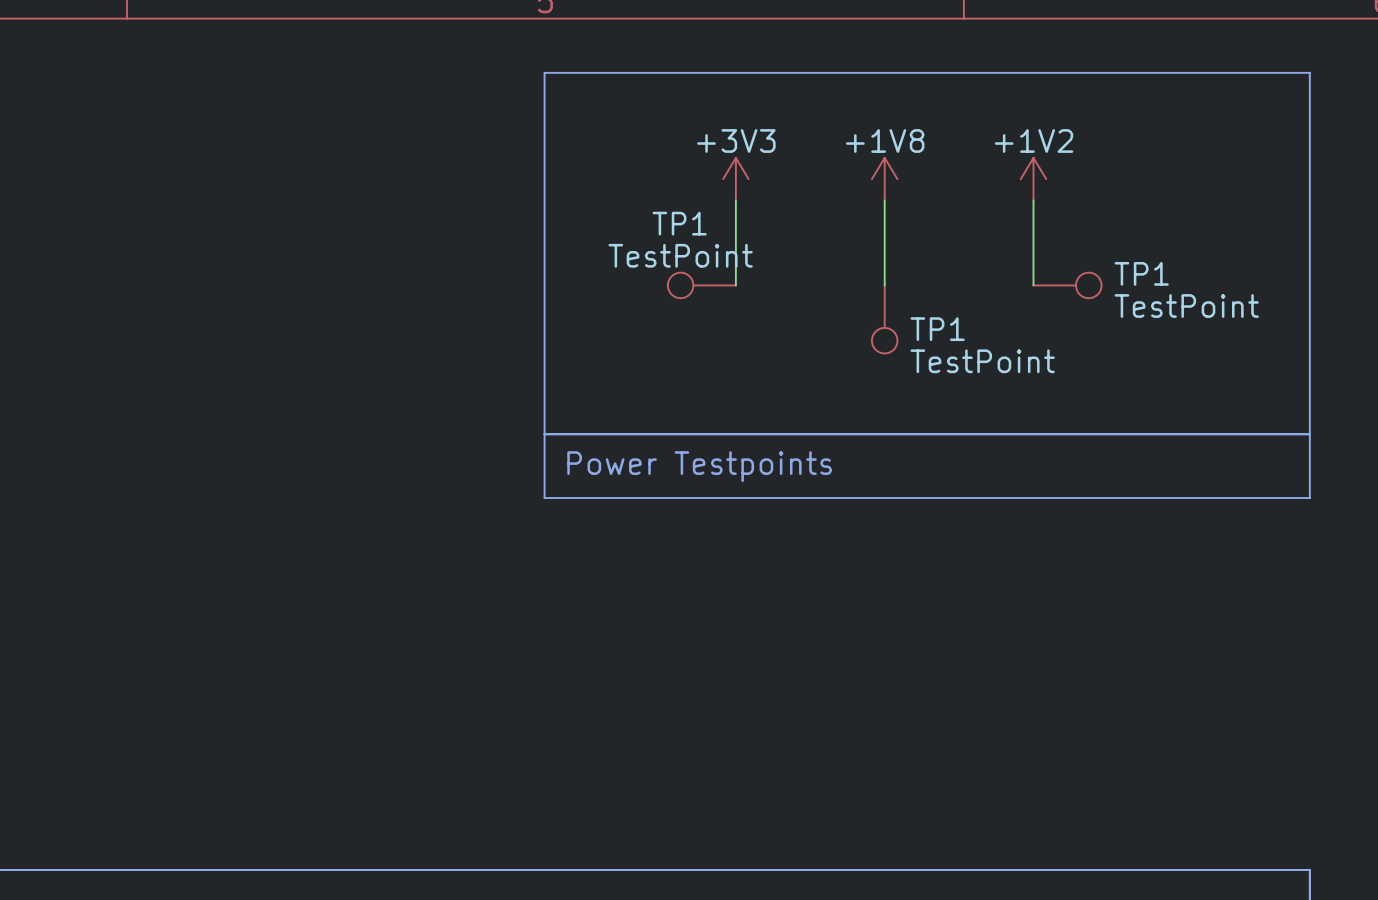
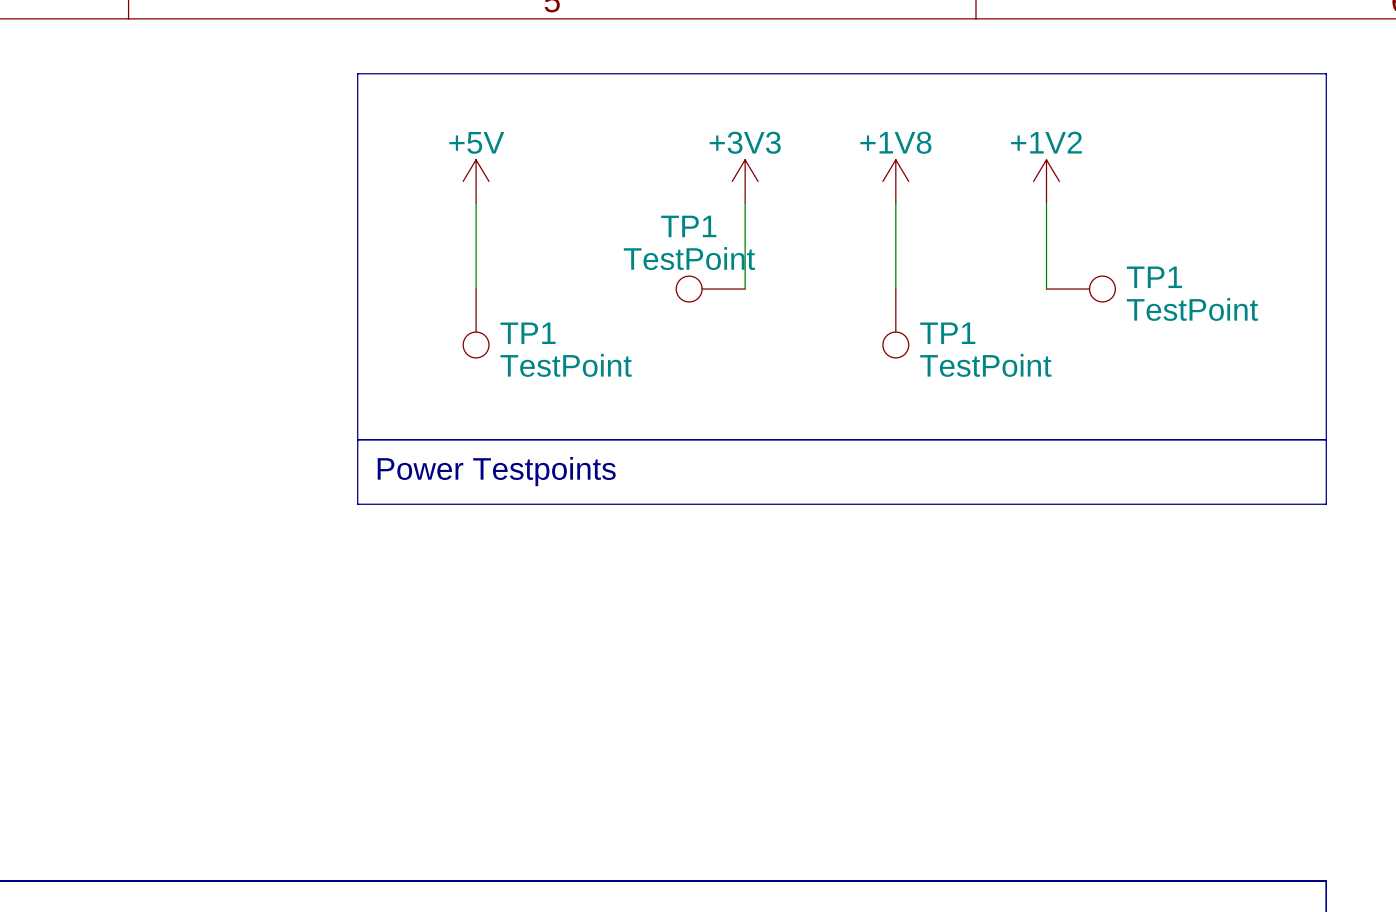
line: (544, 72) (544, 498) -> (551, 73) (357, 73) (357, 504) (551, 504)
power symbol: none -> +5V (476, 181)
wire: none -> (476, 202) (476, 289)
TP1: none -> TestPoint (476, 323)
line: none -> (357, 439) (551, 439)
text position: Power Testpoints (699, 466) -> Power Testpoints (496, 471)

